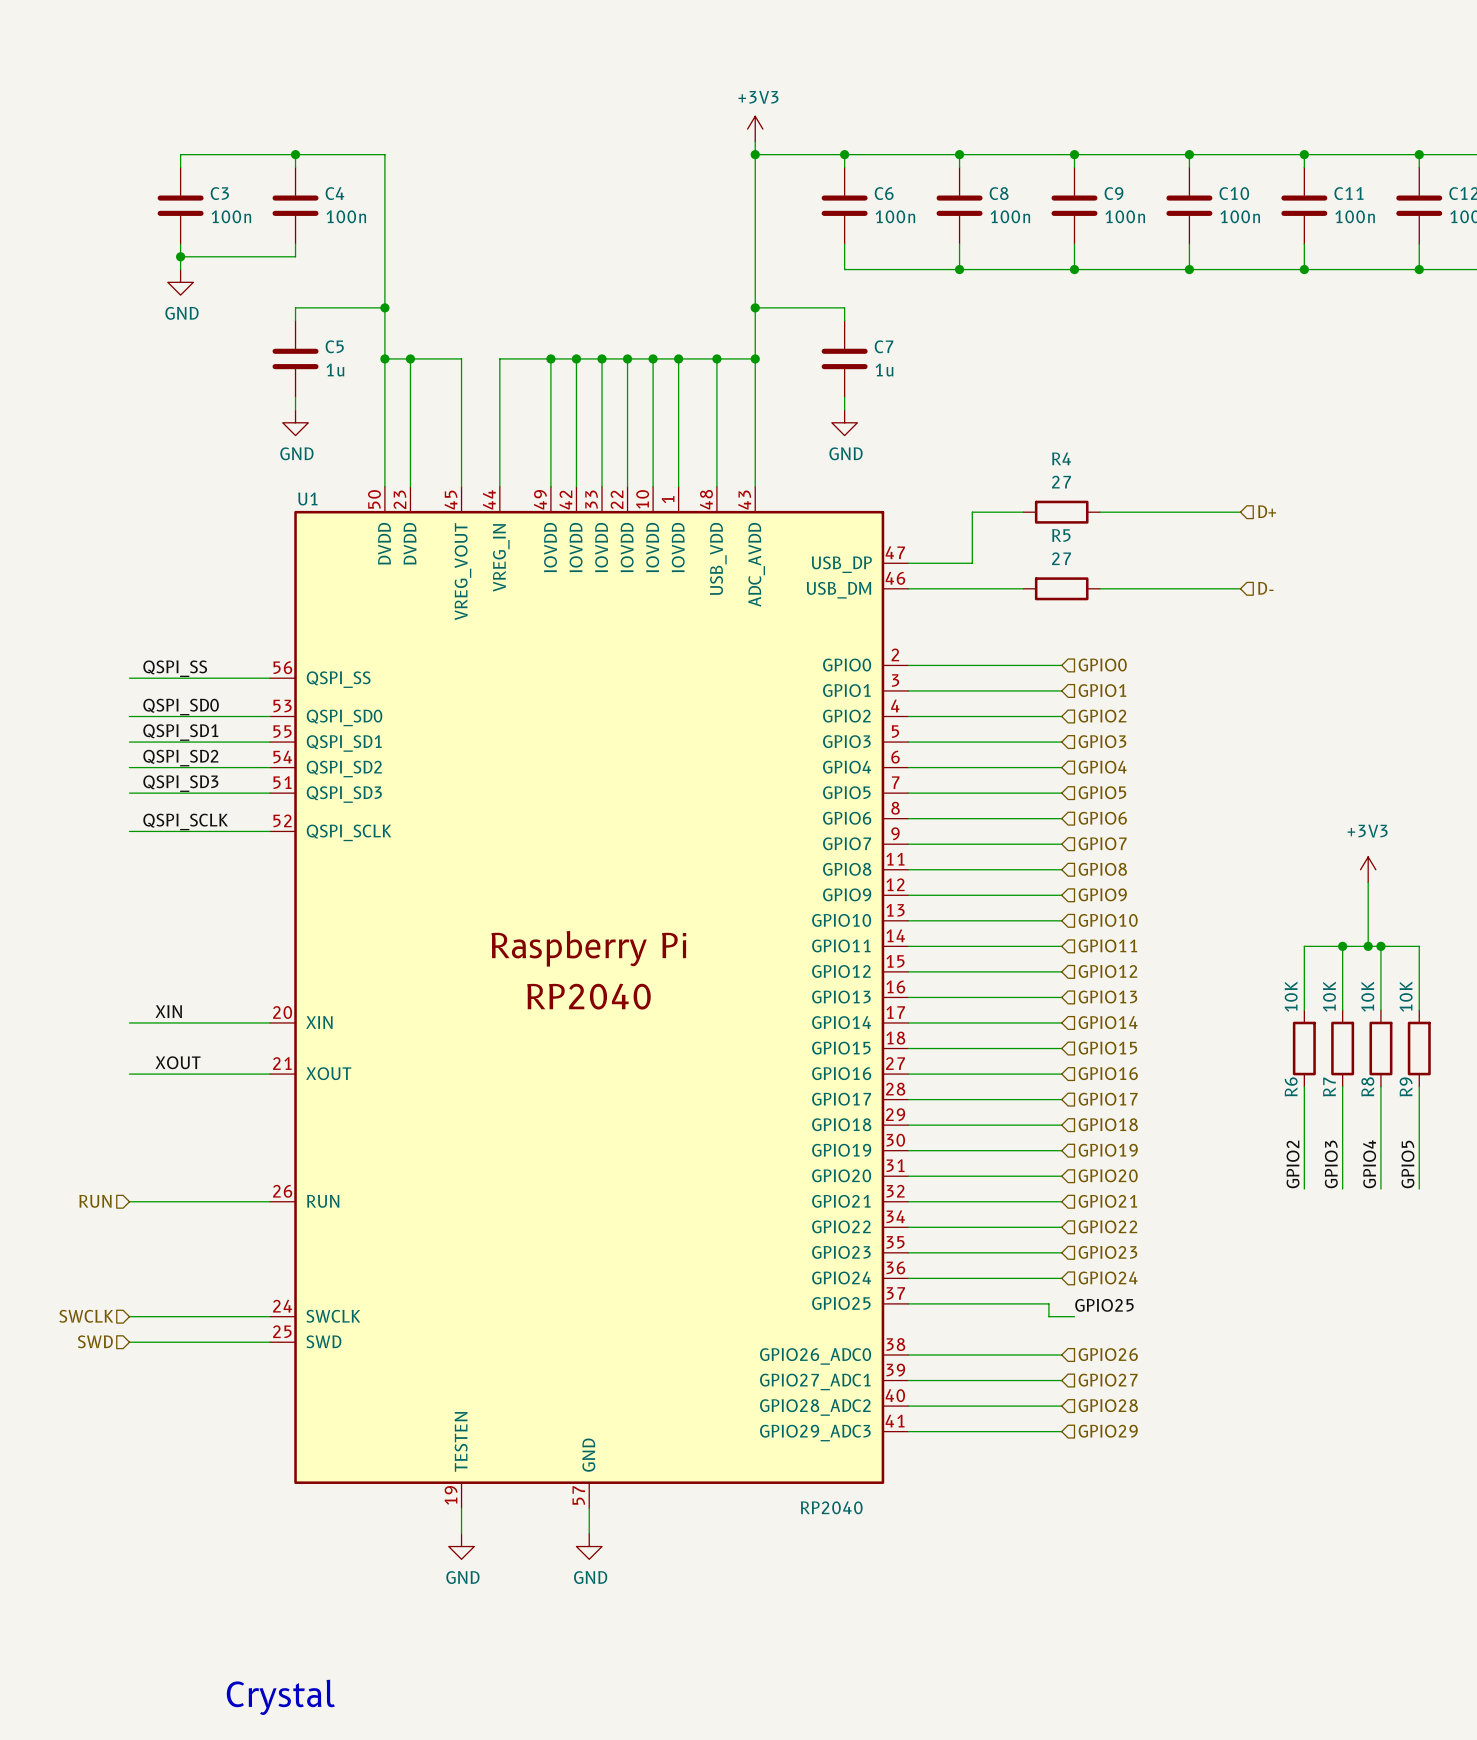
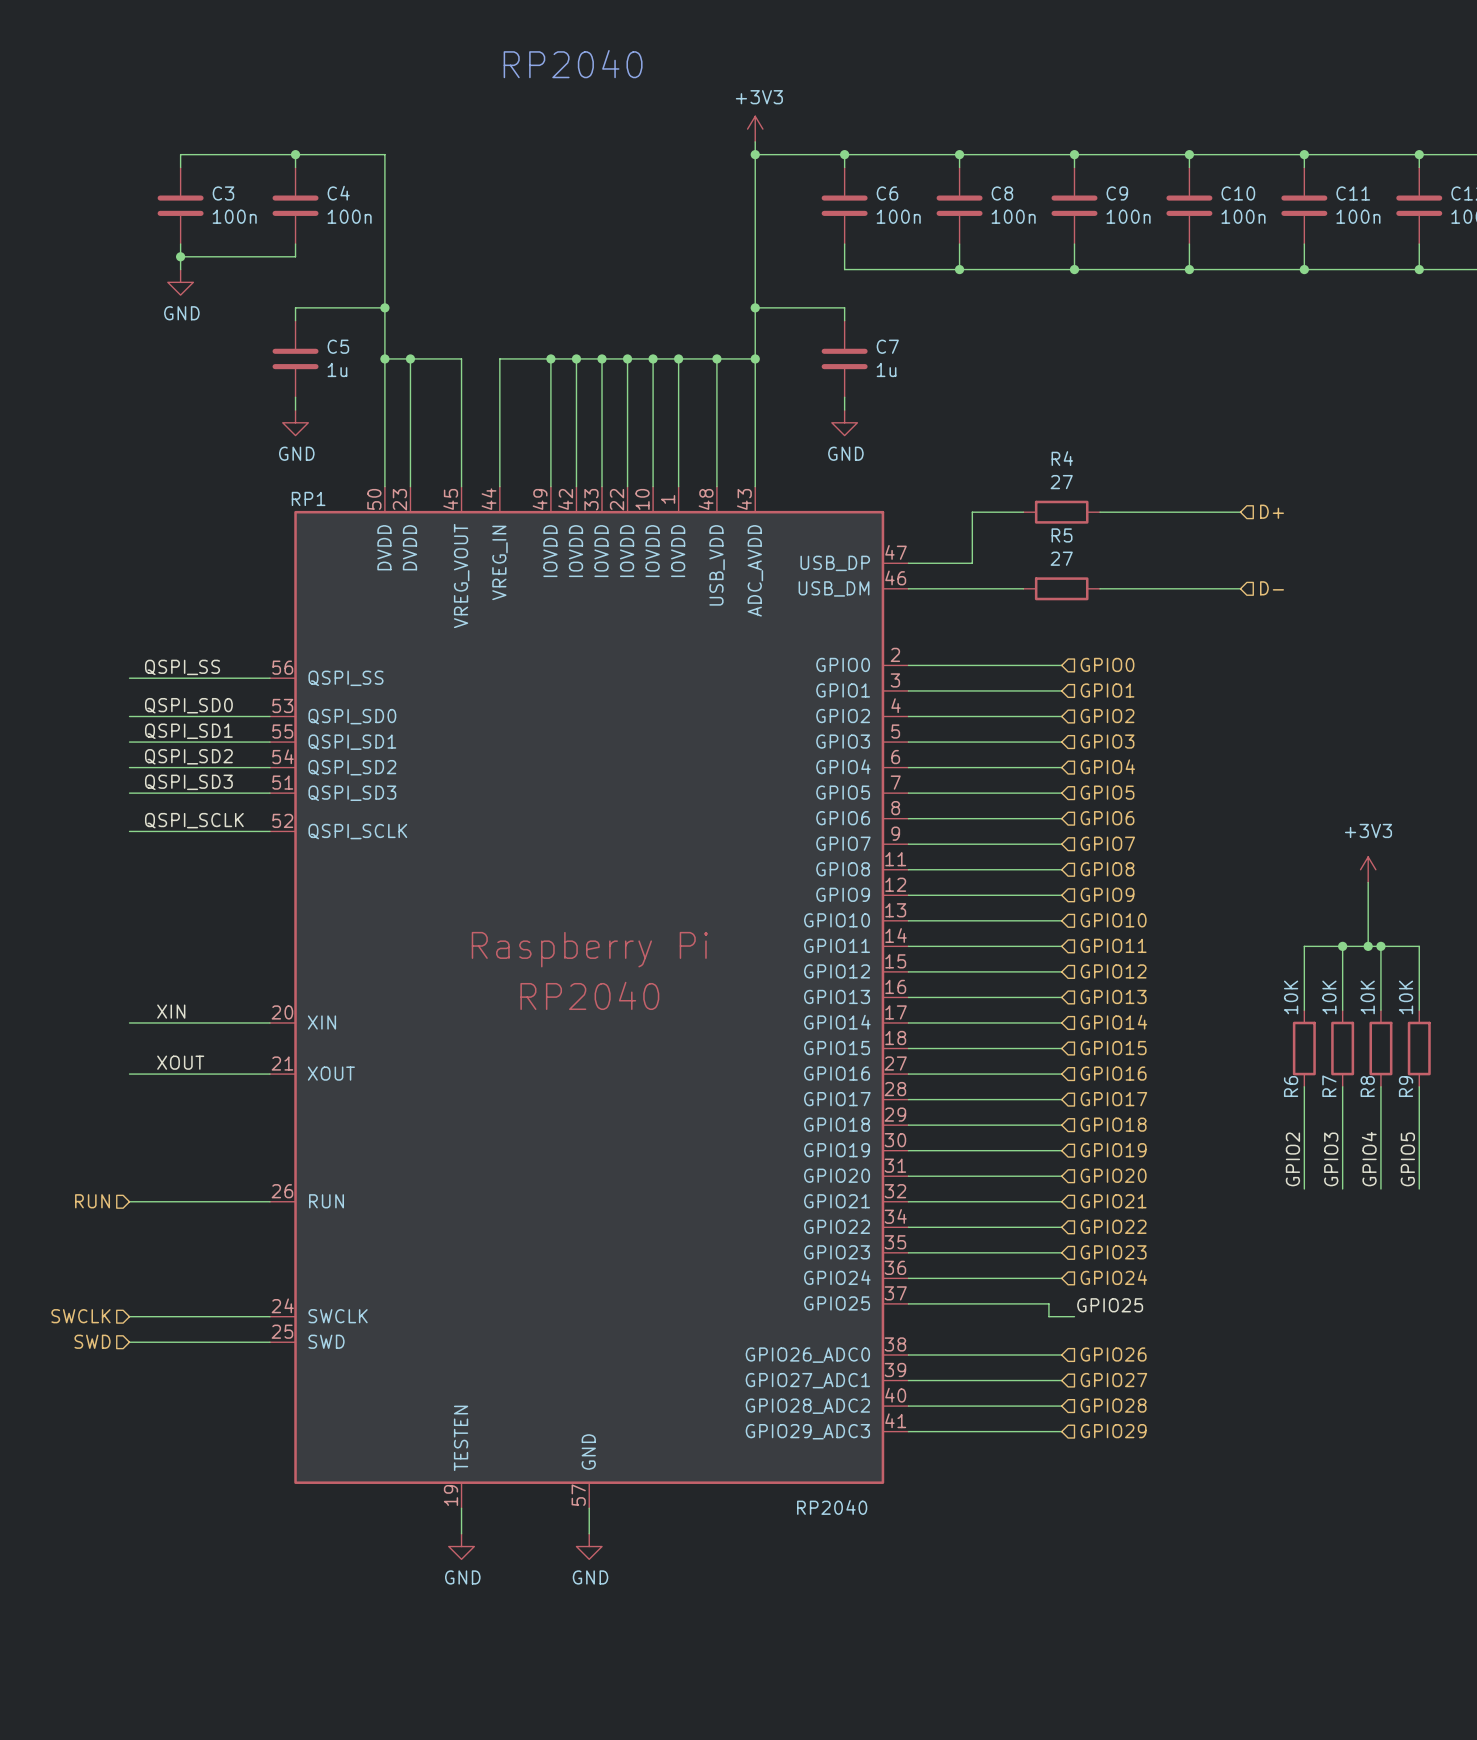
text: none -> RP2040 (573, 64)
U1 name: U1 (307, 499) -> RP1 (308, 498)
text: Crystal (280, 1697) -> none

